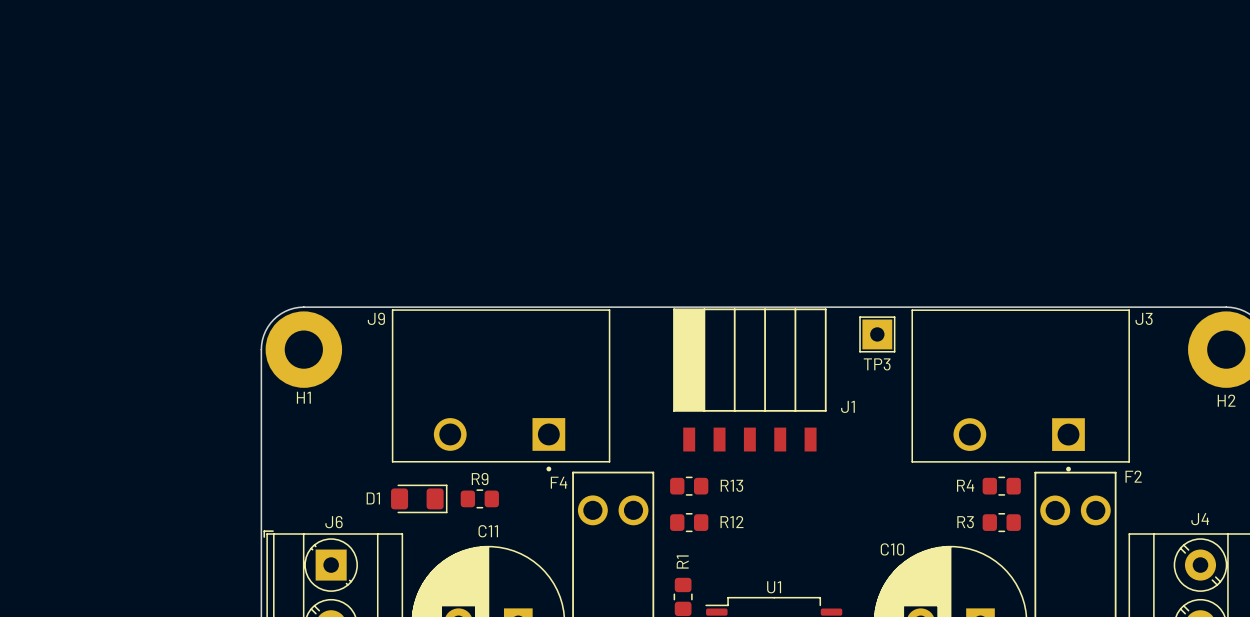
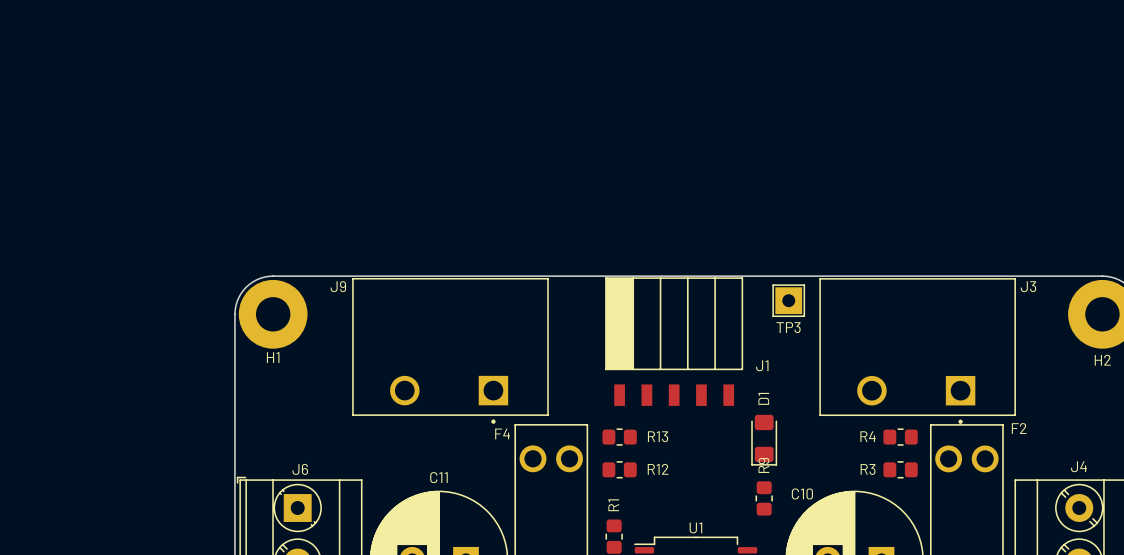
D1 rotation: 0° (419, 498) -> 90° clockwise (764, 440)
D1 position: (419, 498) -> (764, 440)
R9 rotation: 0° (479, 498) -> 90° clockwise (764, 498)
R9 position: (479, 498) -> (764, 498)

